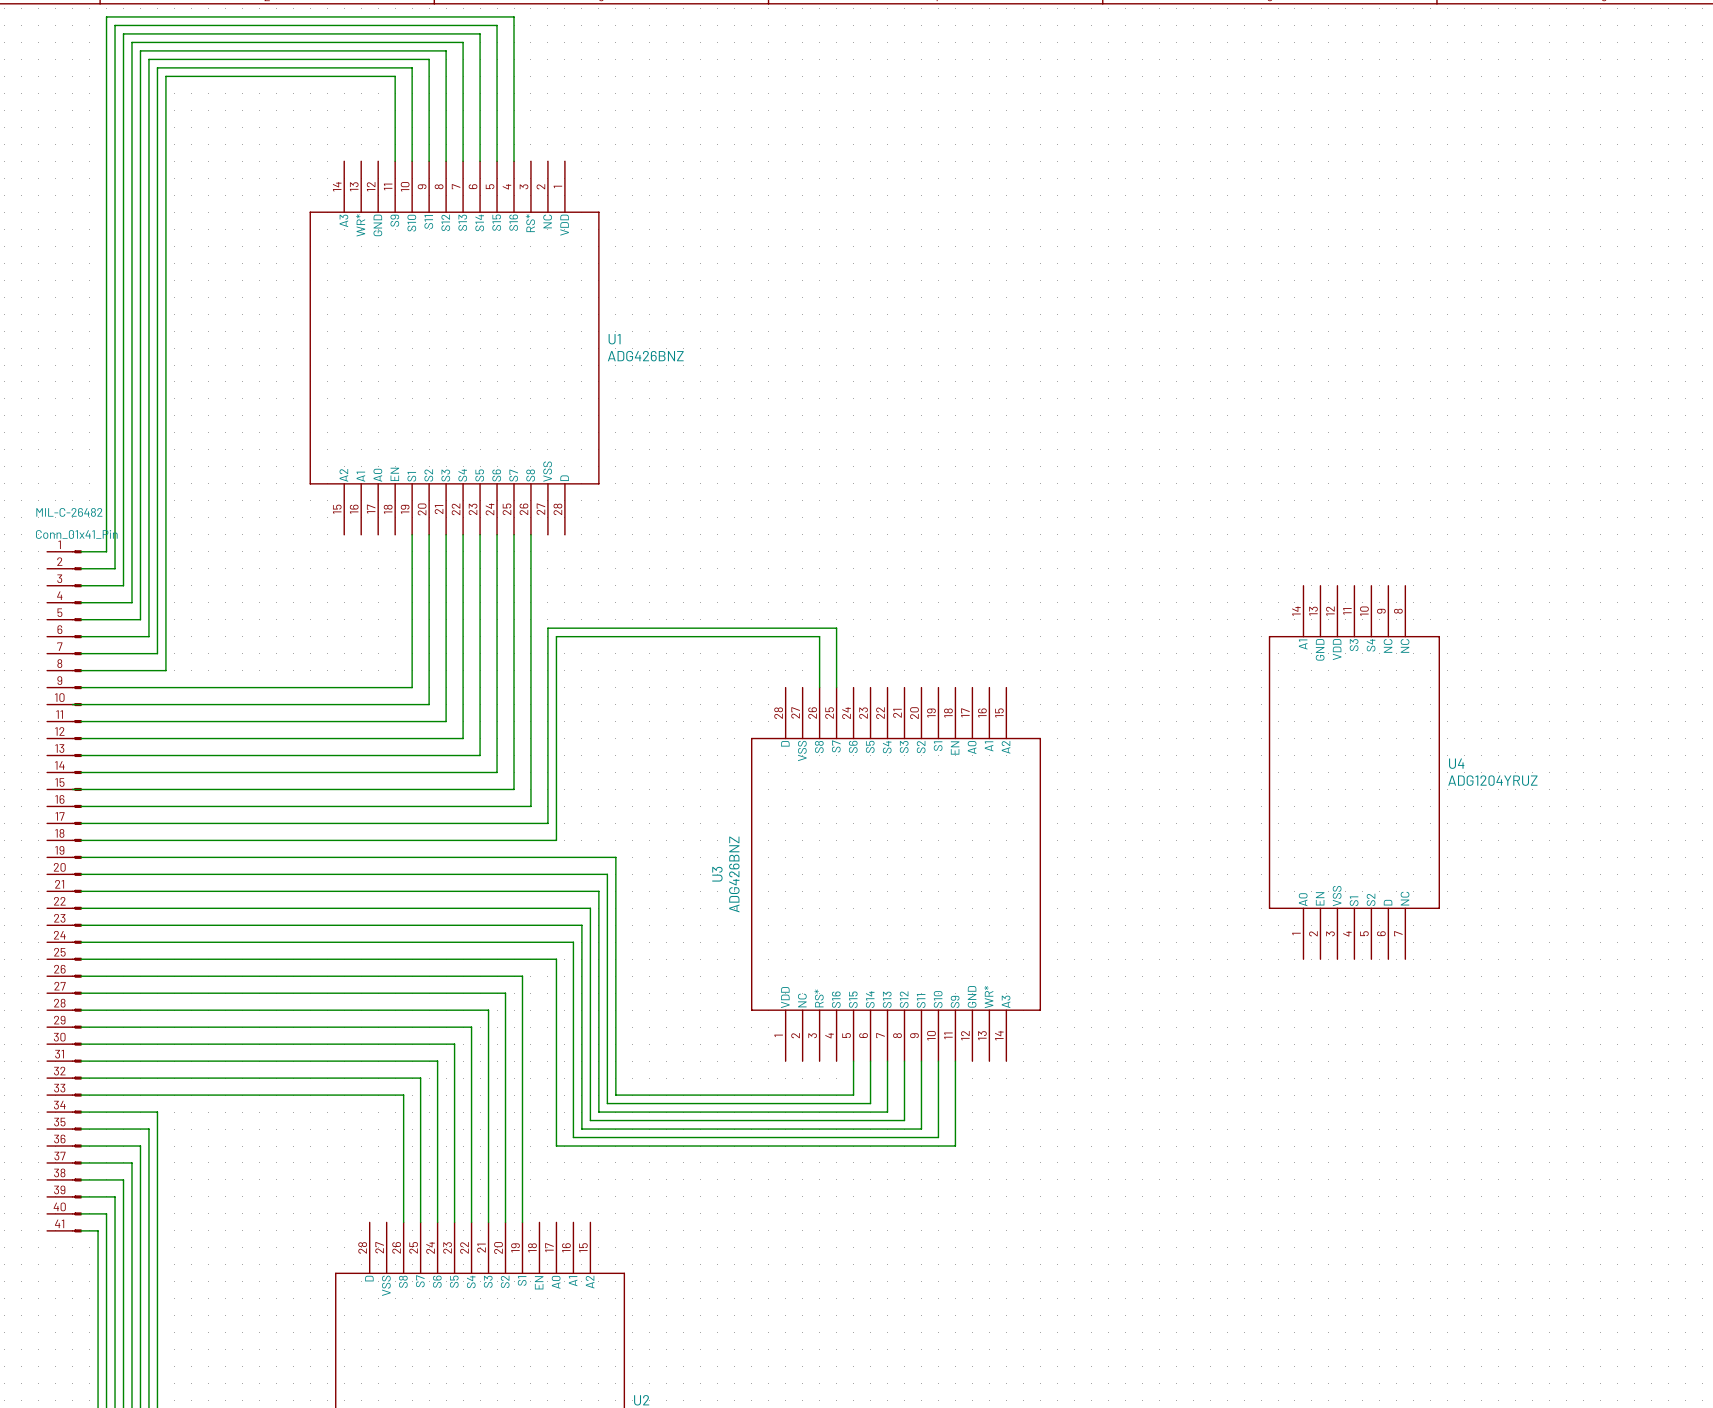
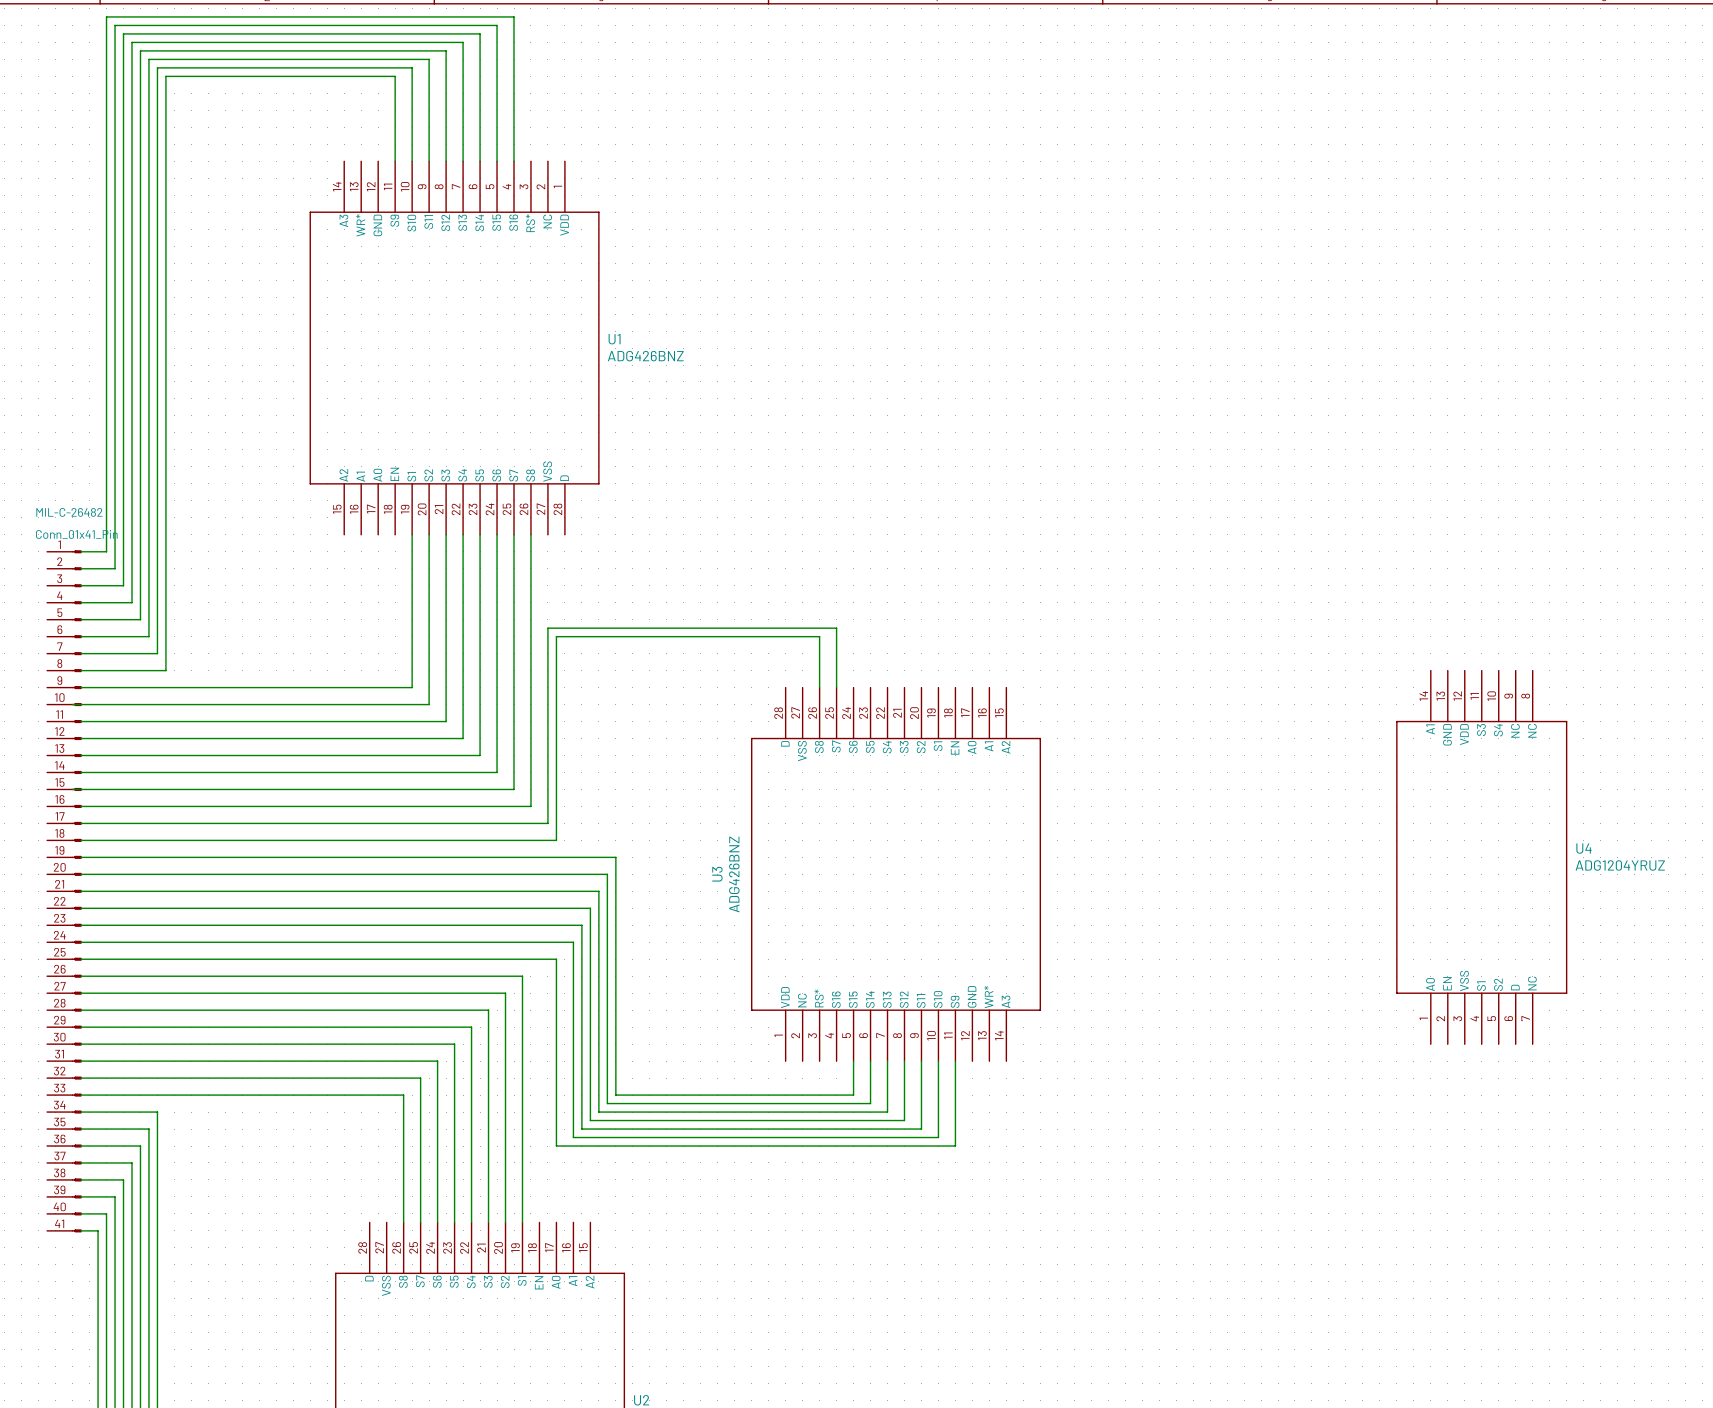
U4 position: (1354, 772) -> (1481, 857)

